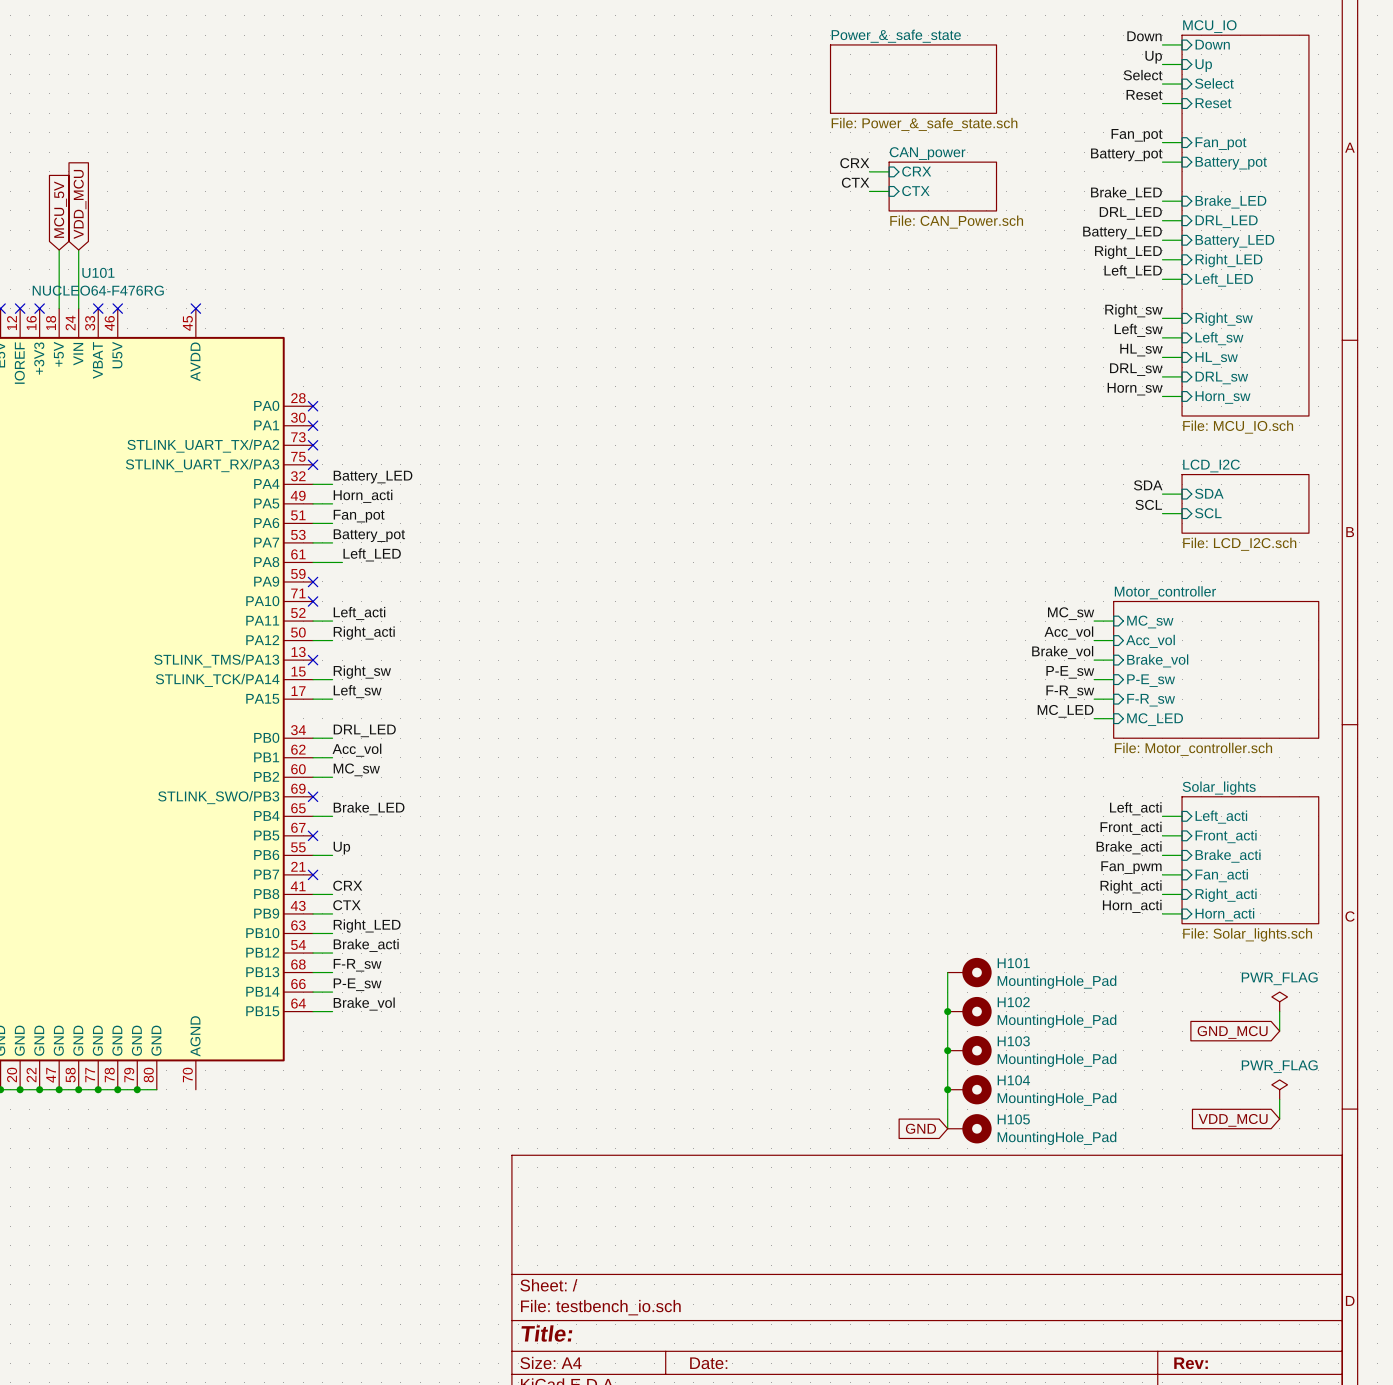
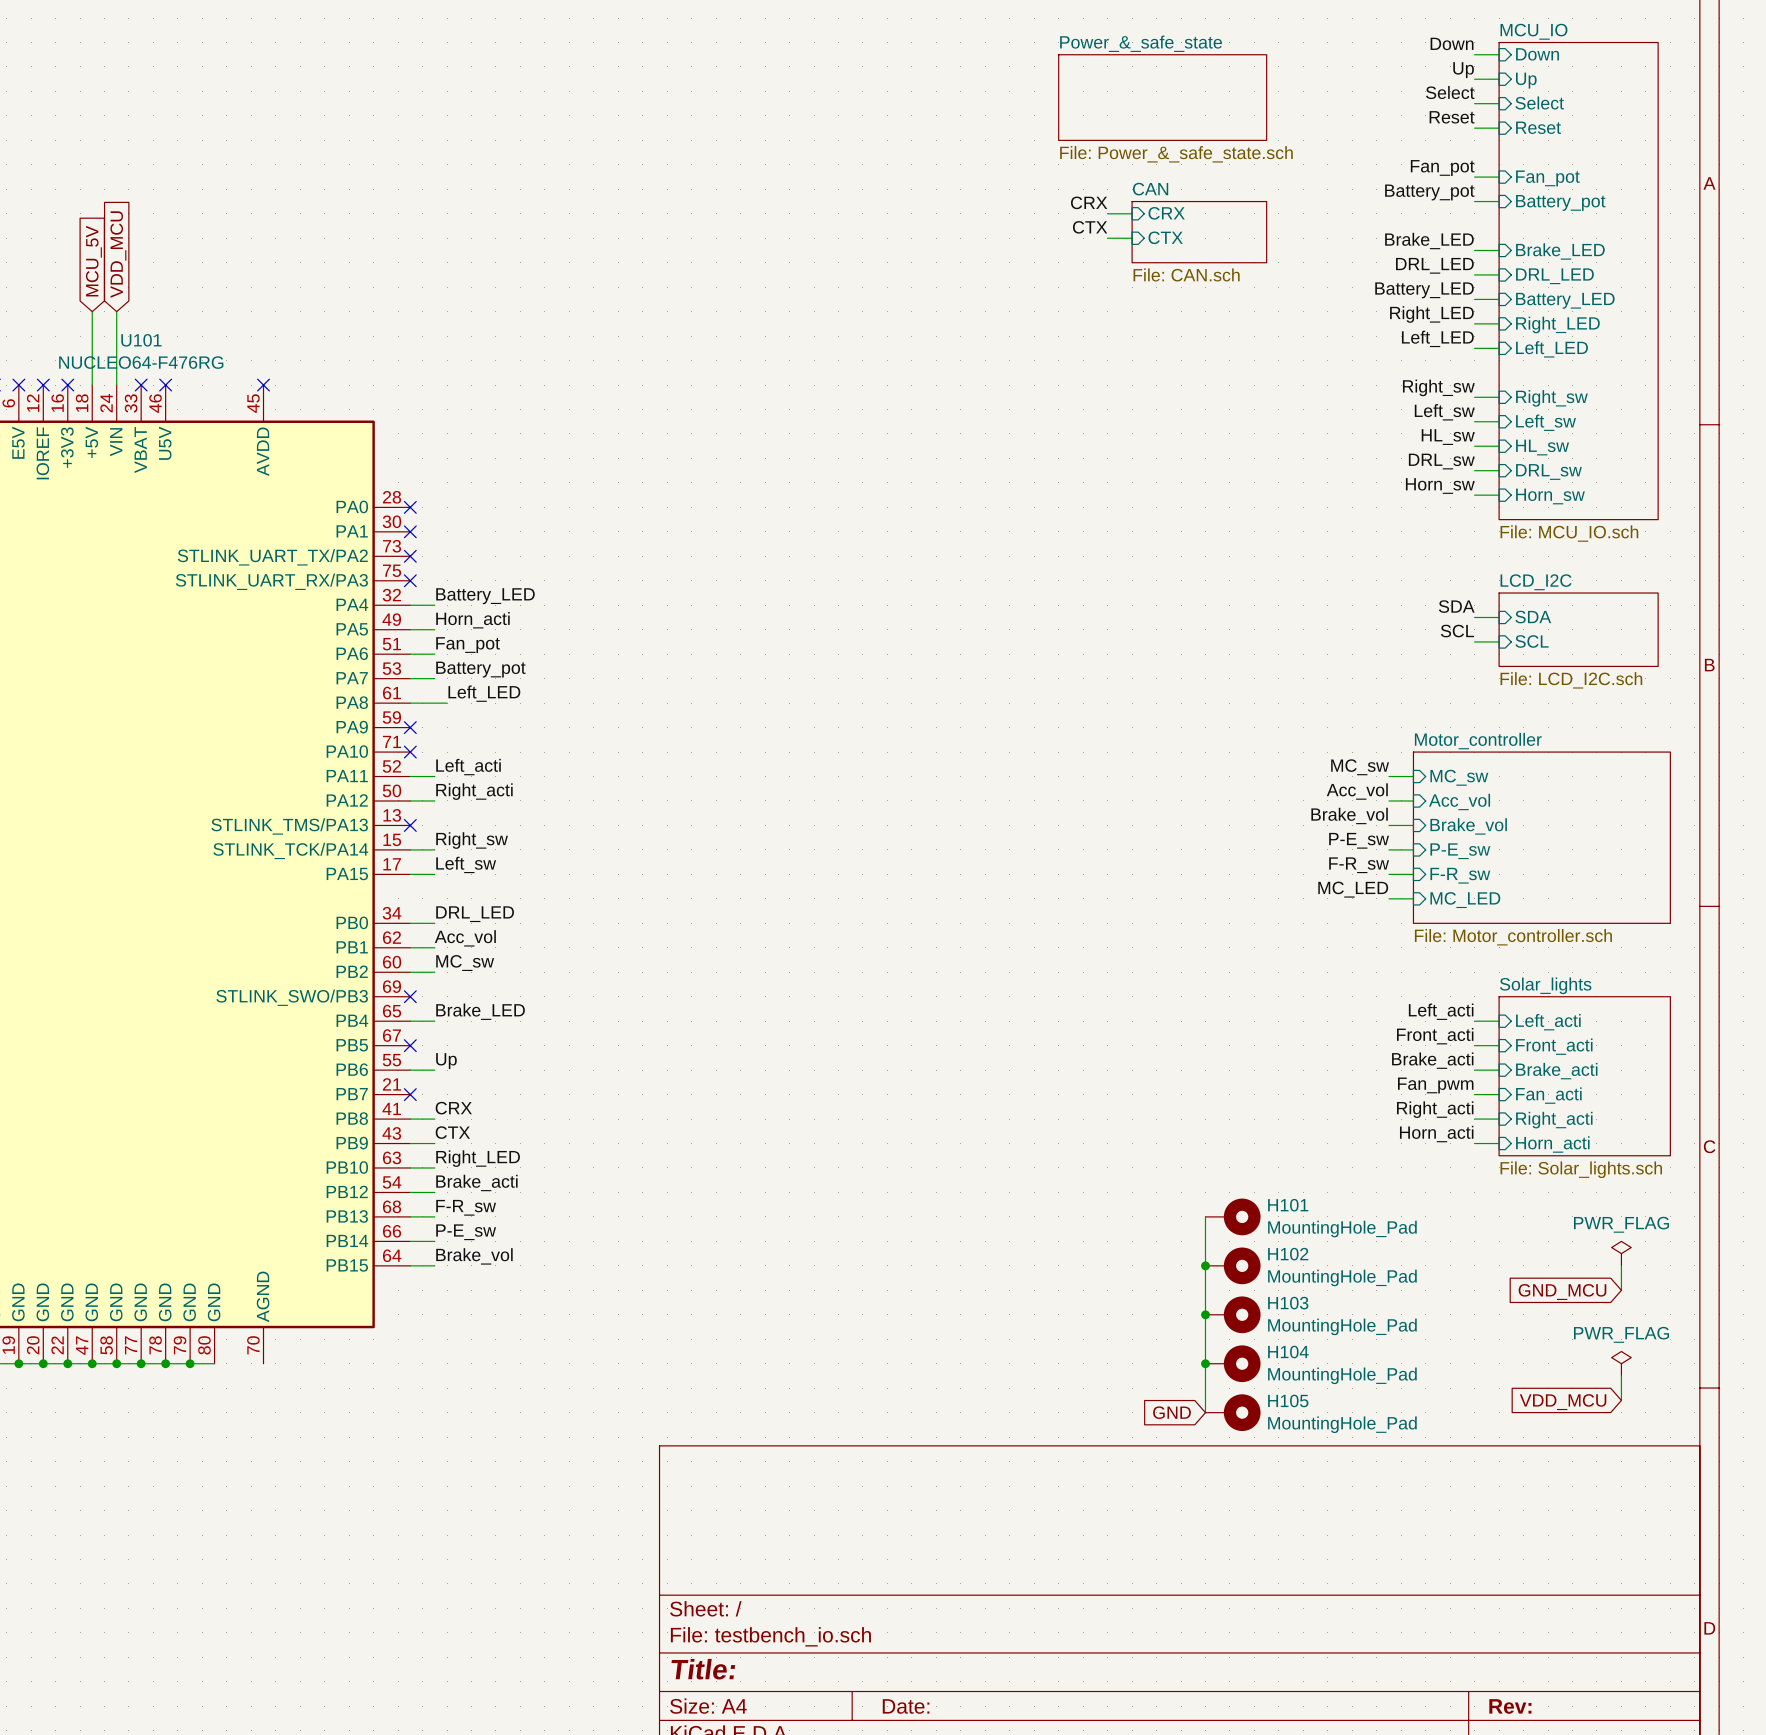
sheet CAN_power name: CAN_power (927, 153) -> CAN (1150, 189)
sheet CAN_power value: File: CAN_Power.sch (956, 222) -> File: CAN.sch (1186, 274)

